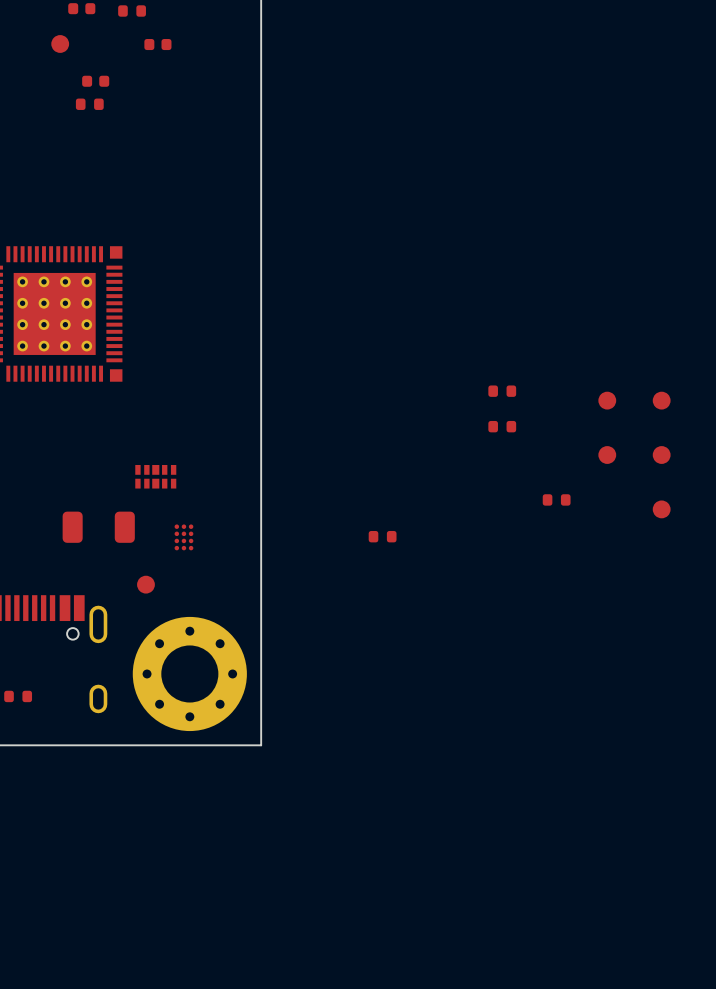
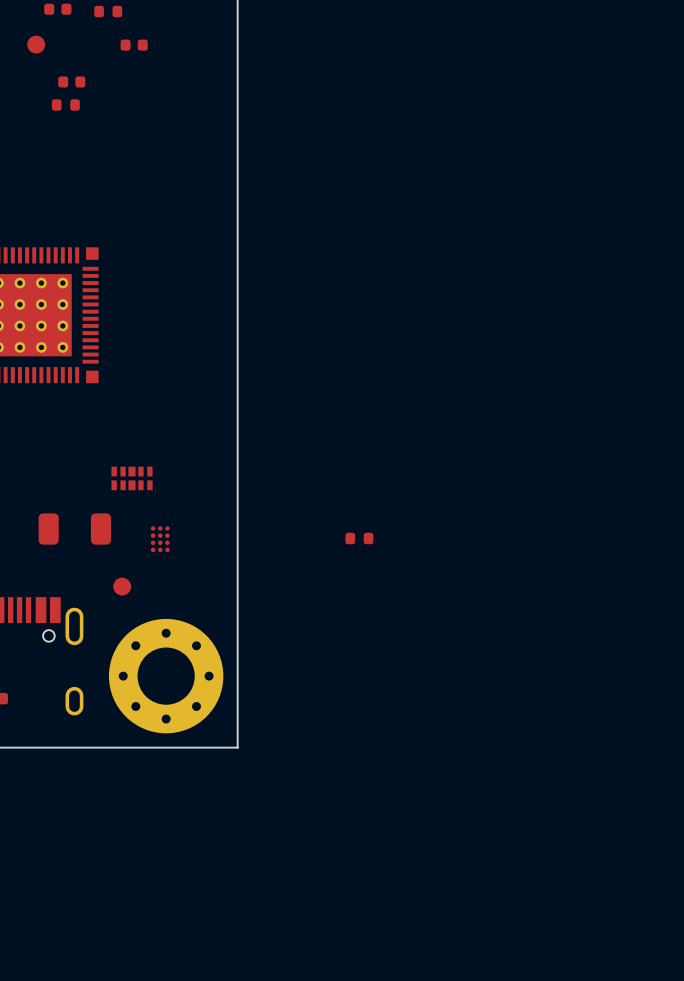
part: (502, 391) -> none
part: (607, 400) -> none
part: (661, 400) -> none
part: (502, 426) -> none
part: (607, 455) -> none
part: (661, 455) -> none
part: (556, 499) -> none
part: (661, 509) -> none

